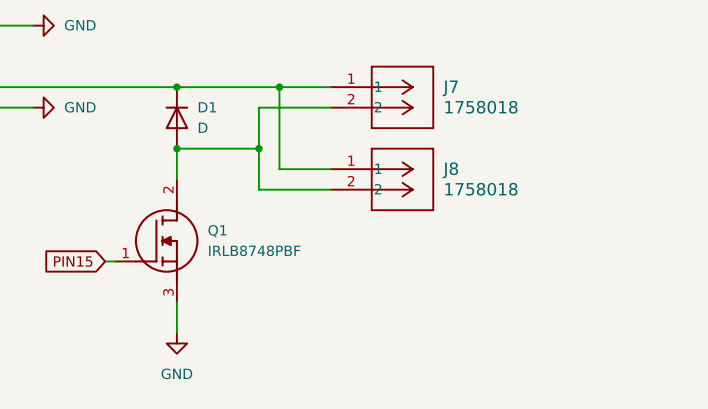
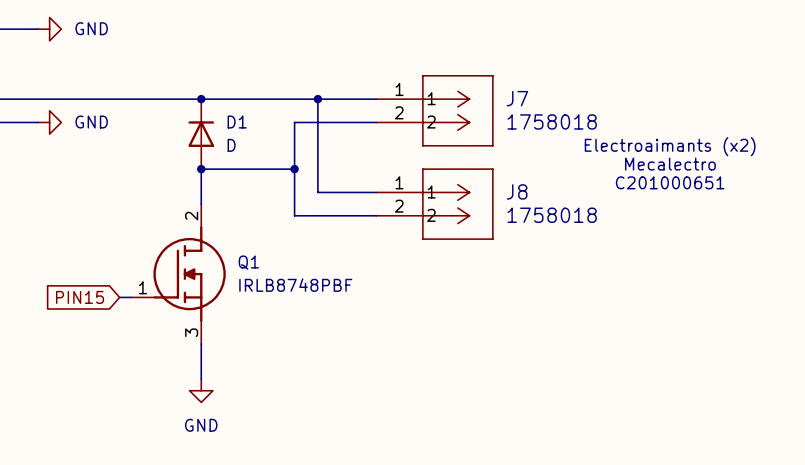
text: none -> Electroaimants (x2) (670, 146)
text: none -> Mecalectro (670, 164)
text: none -> C201000651 (670, 182)

